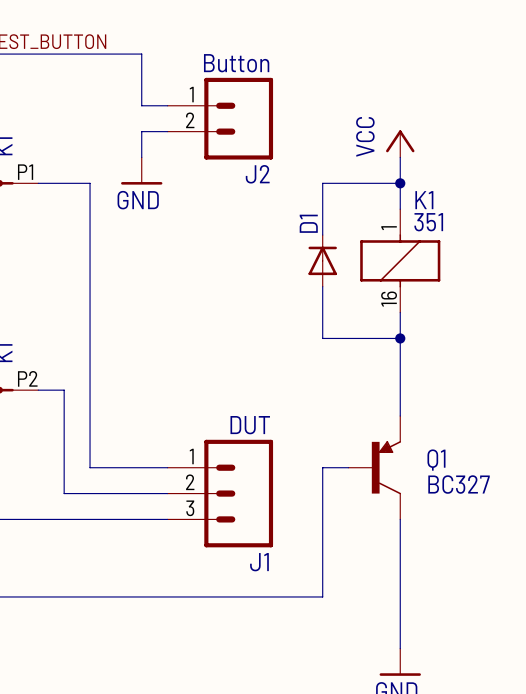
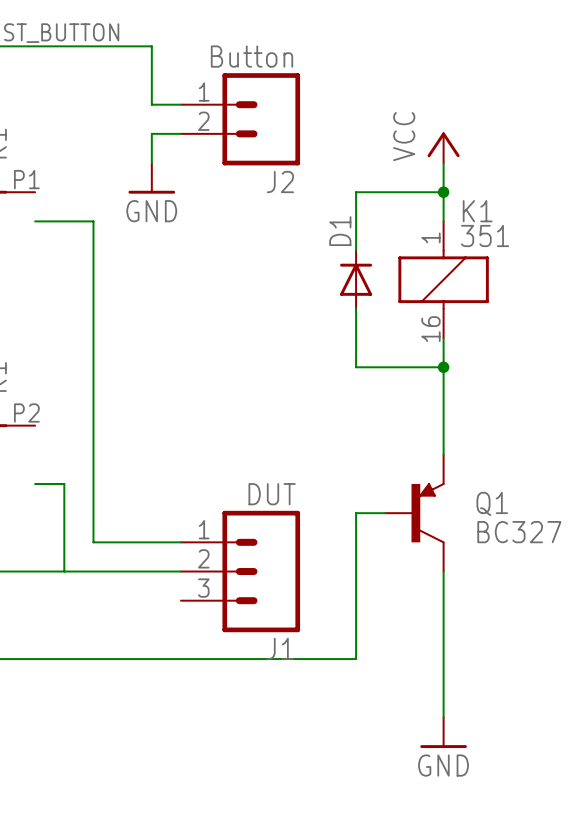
wire: (38, 183) (90, 183) (90, 209) -> (35, 221) (93, 221)
wire: (38, 390) (64, 390) (64, 441) -> (35, 483) (64, 483)
wire: (90, 467) (167, 467) -> none
wire: (64, 493) (90, 493) -> (93, 513) (93, 542)
wire: none -> (64, 542) (64, 571)
J1 position: (220, 493) -> (240, 571)

